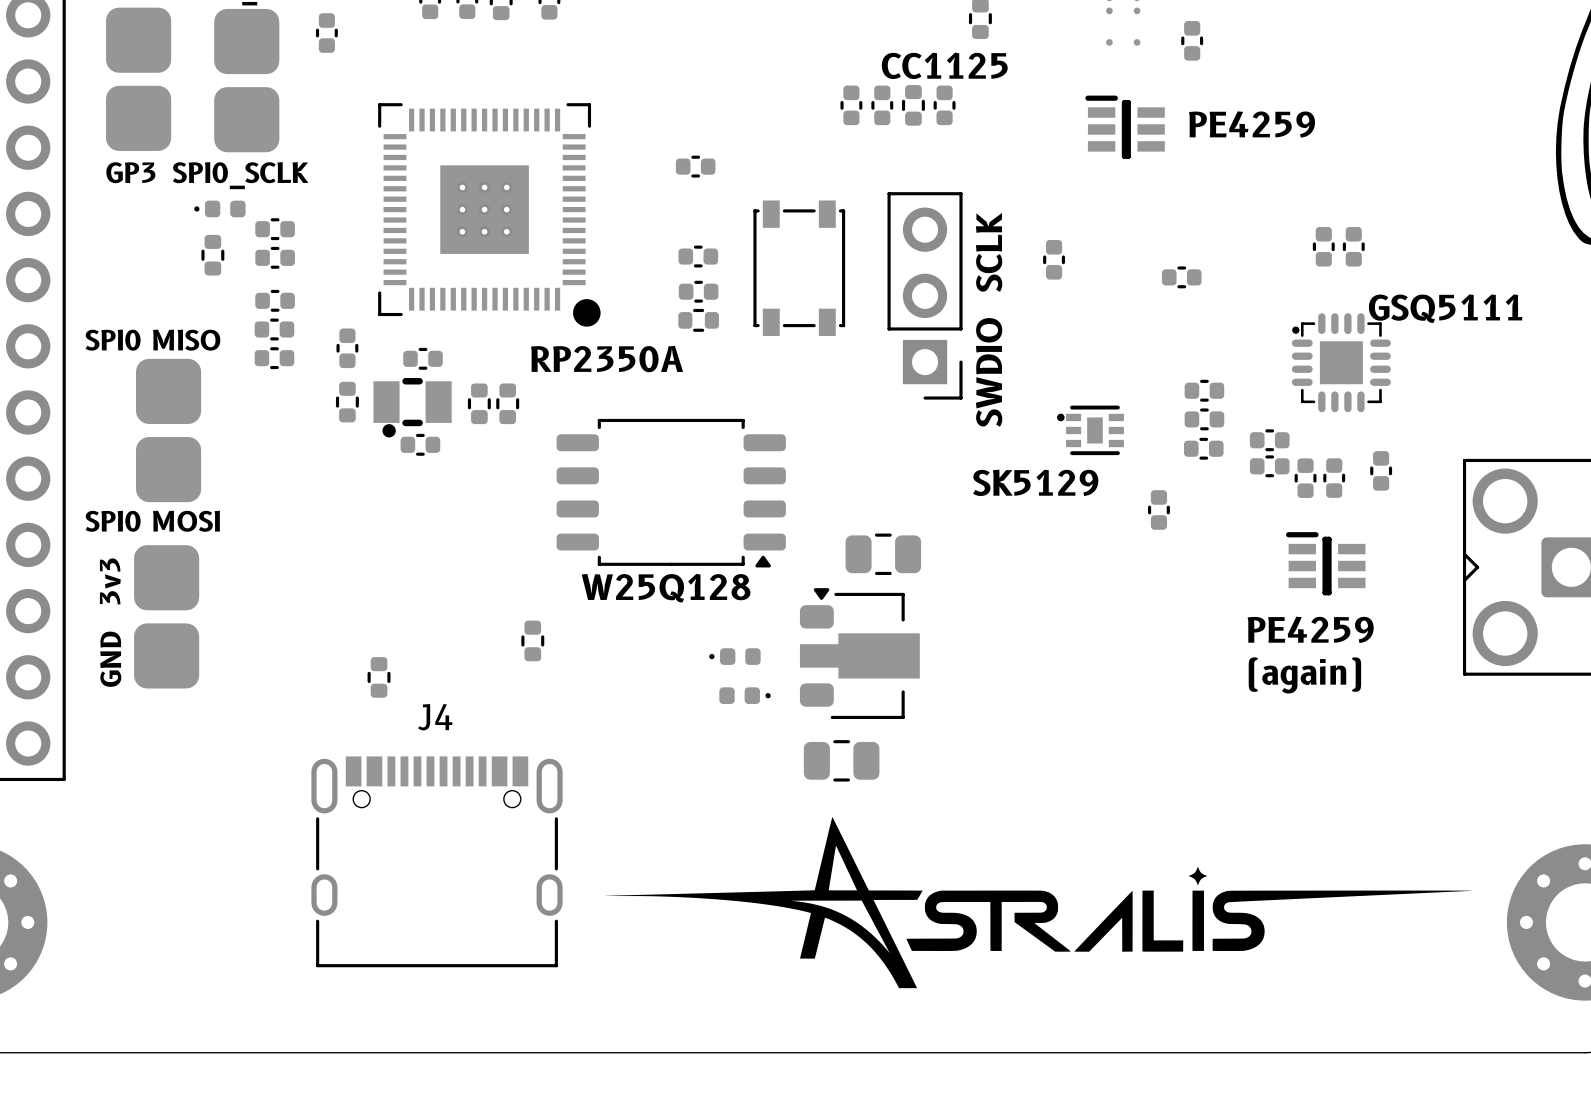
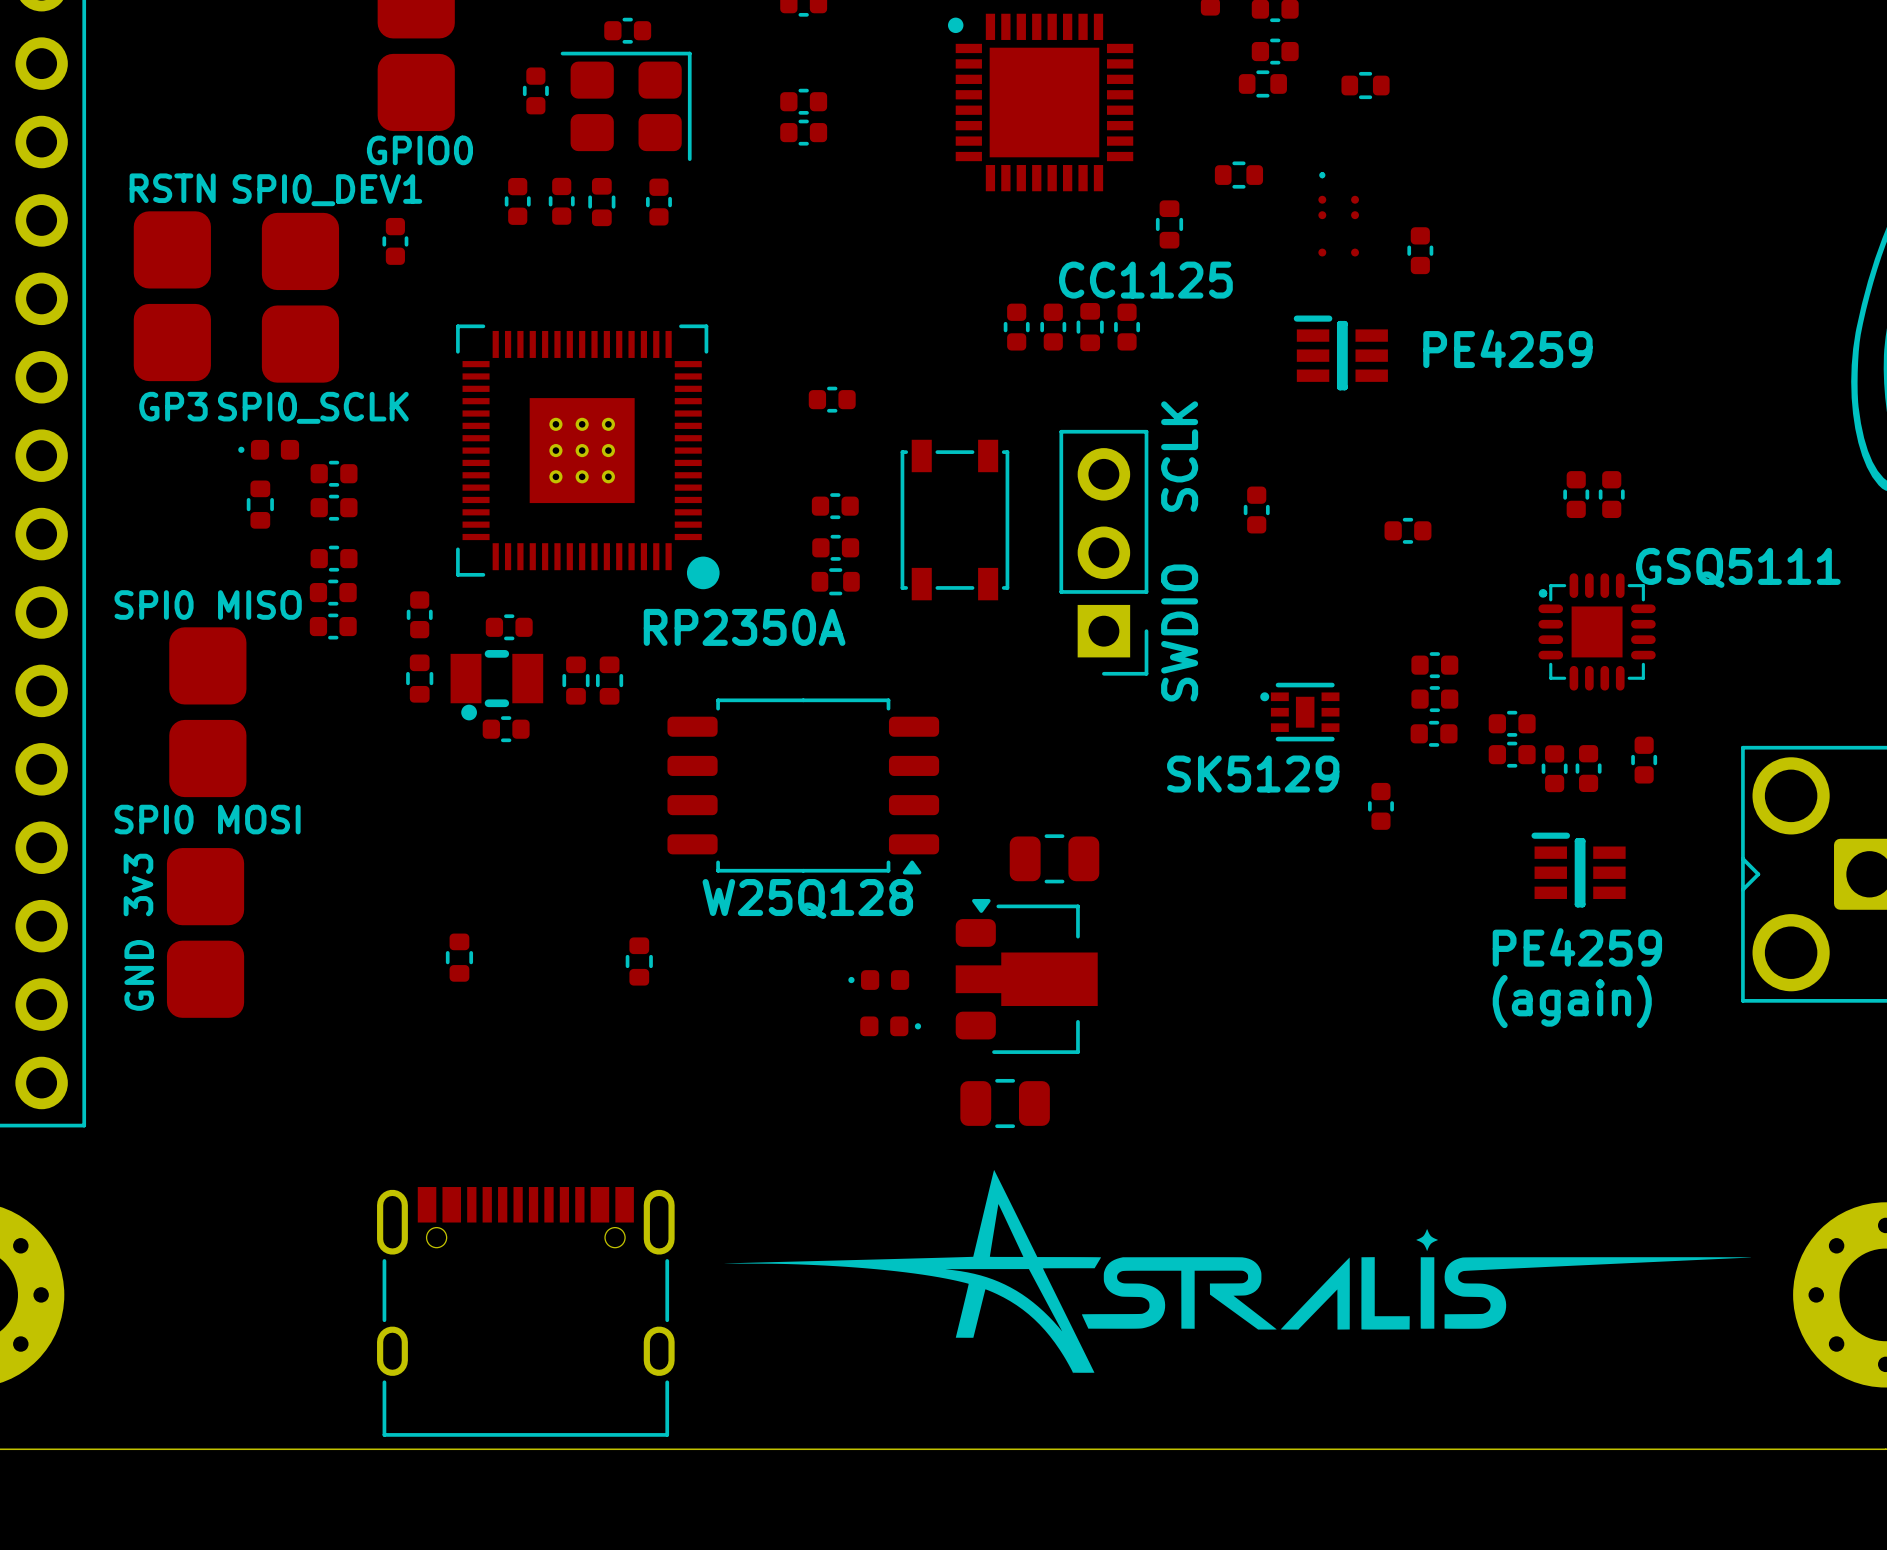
part position: (379, 677) -> (459, 957)
J4: (437, 861) -> none
part: none -> (525, 1311)

